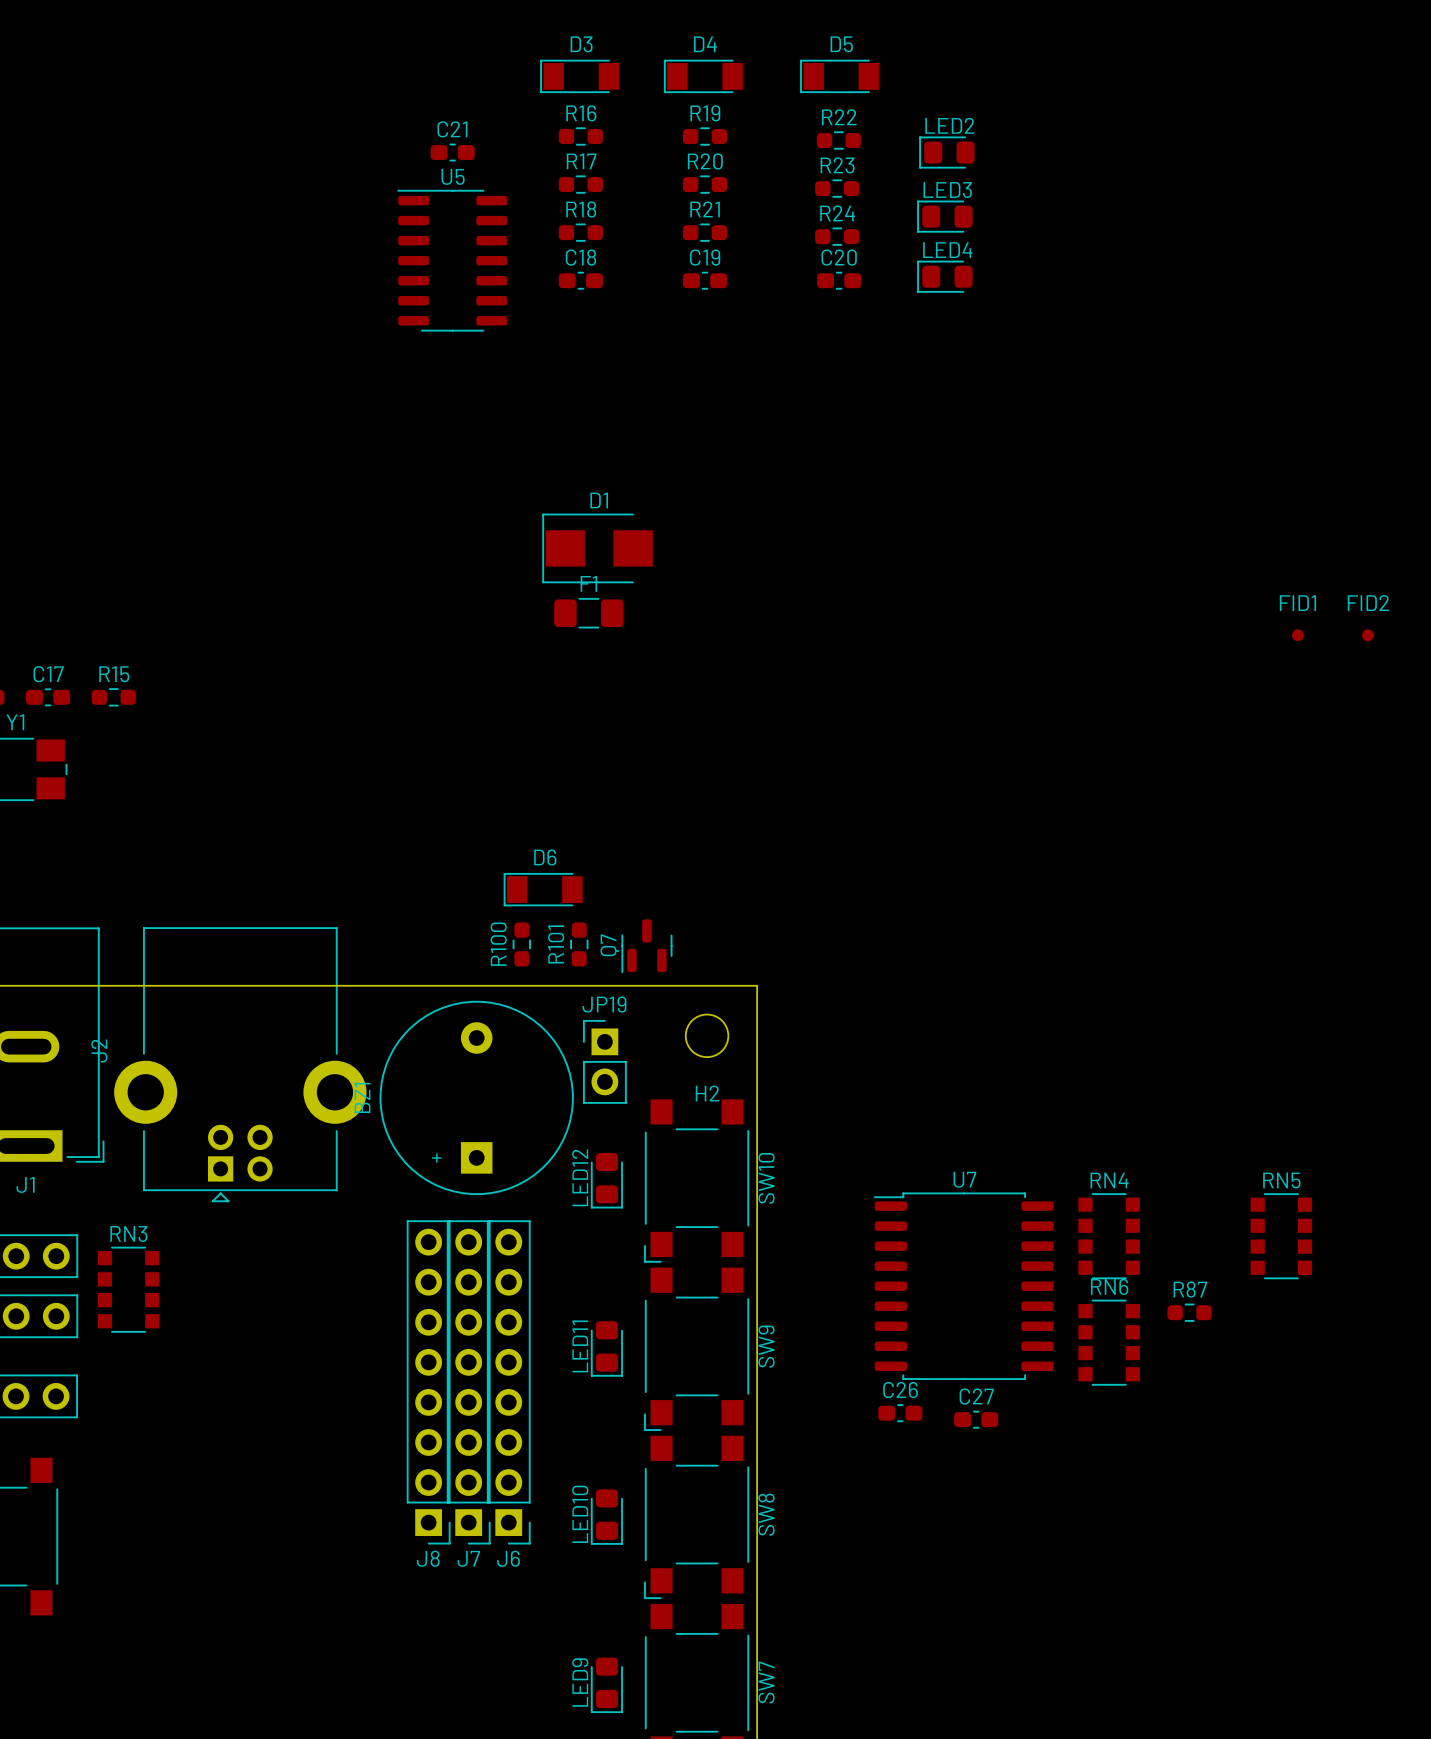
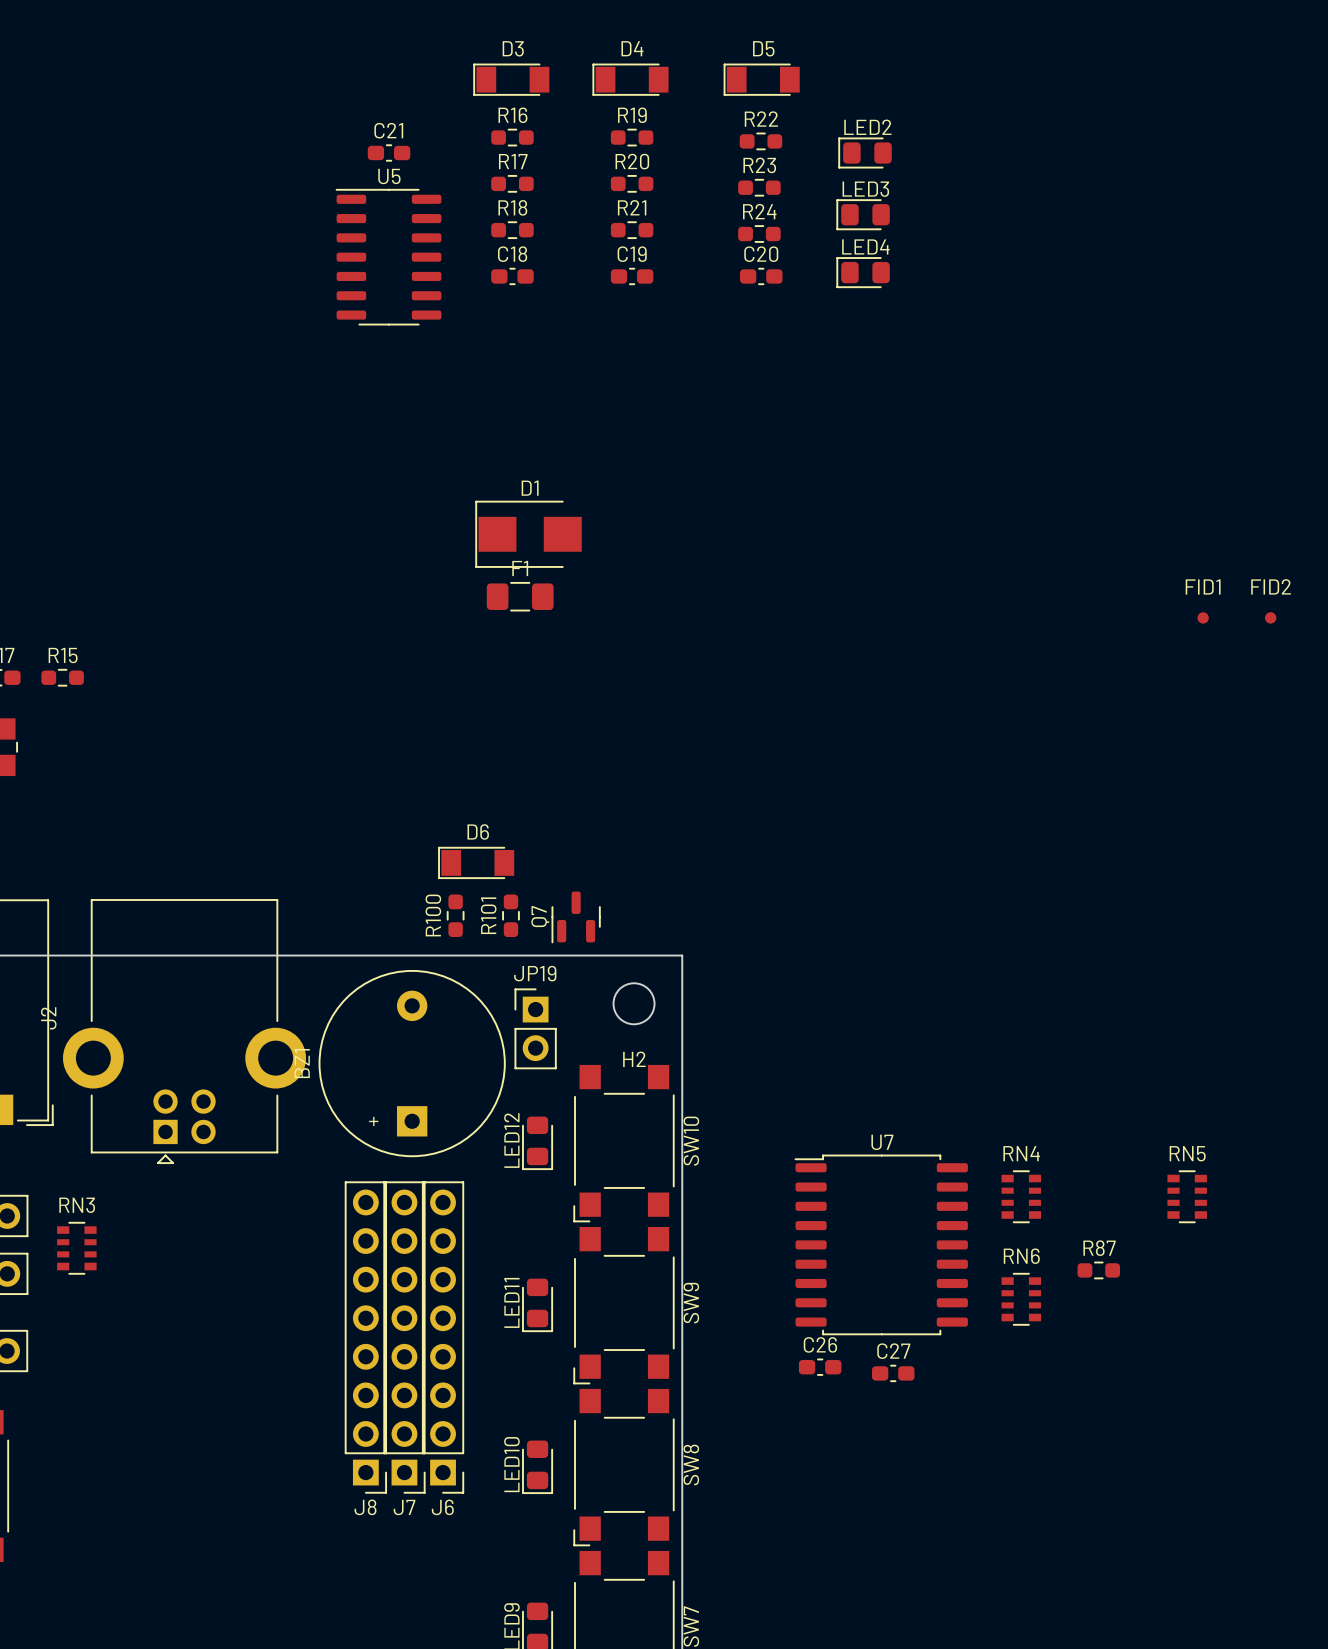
RN4 footprint: [1078, 1193, 1140, 1280] -> [1001, 1170, 1042, 1224]
RN5 footprint: [1250, 1193, 1313, 1280] -> [1167, 1170, 1207, 1224]
RN3 footprint: [97, 1246, 160, 1333] -> [57, 1221, 97, 1275]
RN6 footprint: [1078, 1299, 1140, 1386] -> [1001, 1272, 1042, 1326]

